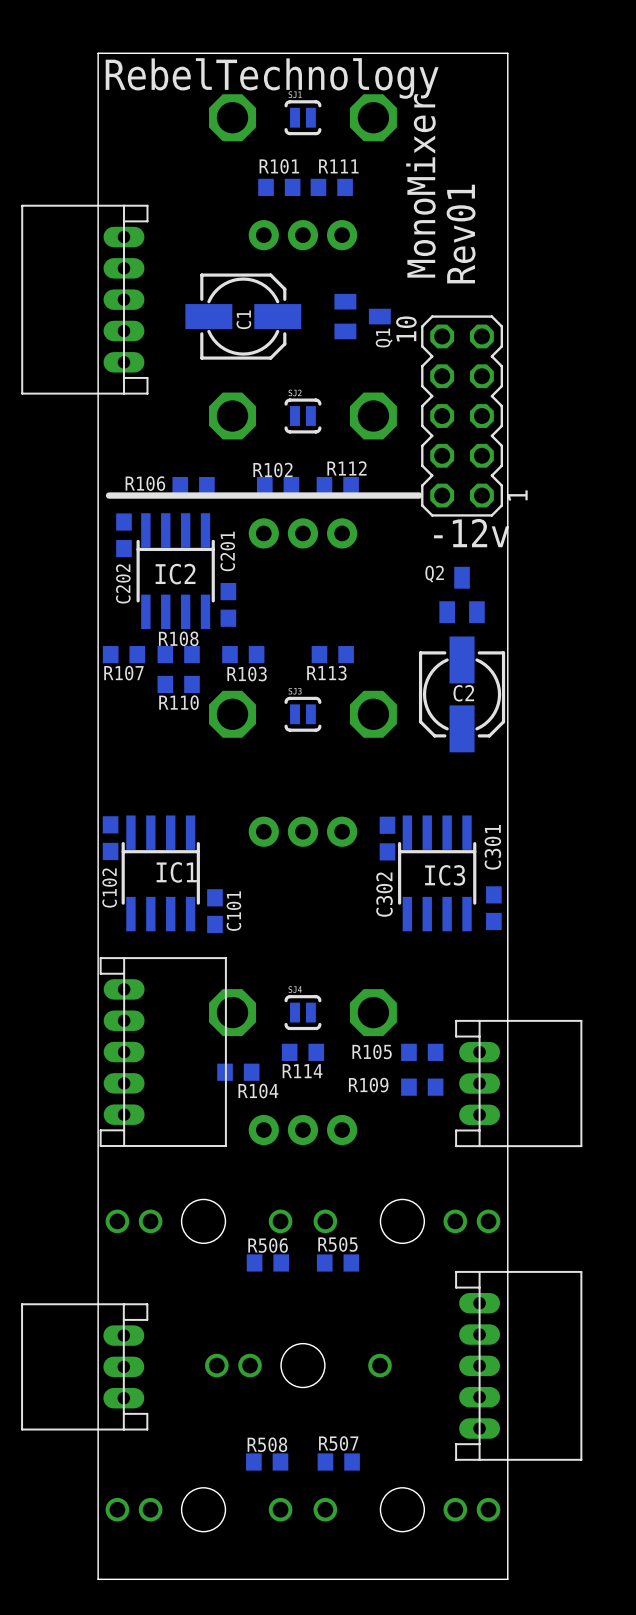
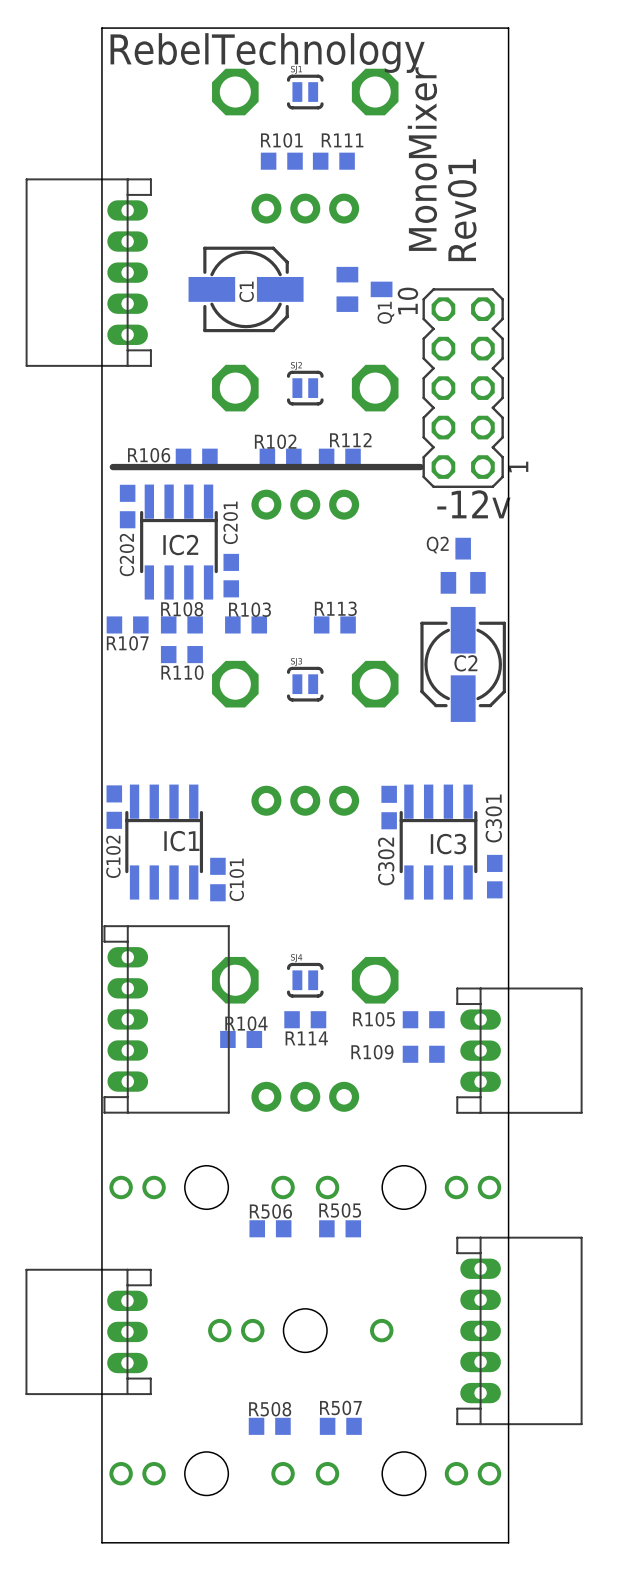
R113 name position: R113 (326, 673) -> R113 (335, 608)
R103 name position: R103 (247, 674) -> R103 (249, 609)
R104 name position: R104 (258, 1091) -> R104 (246, 1023)

